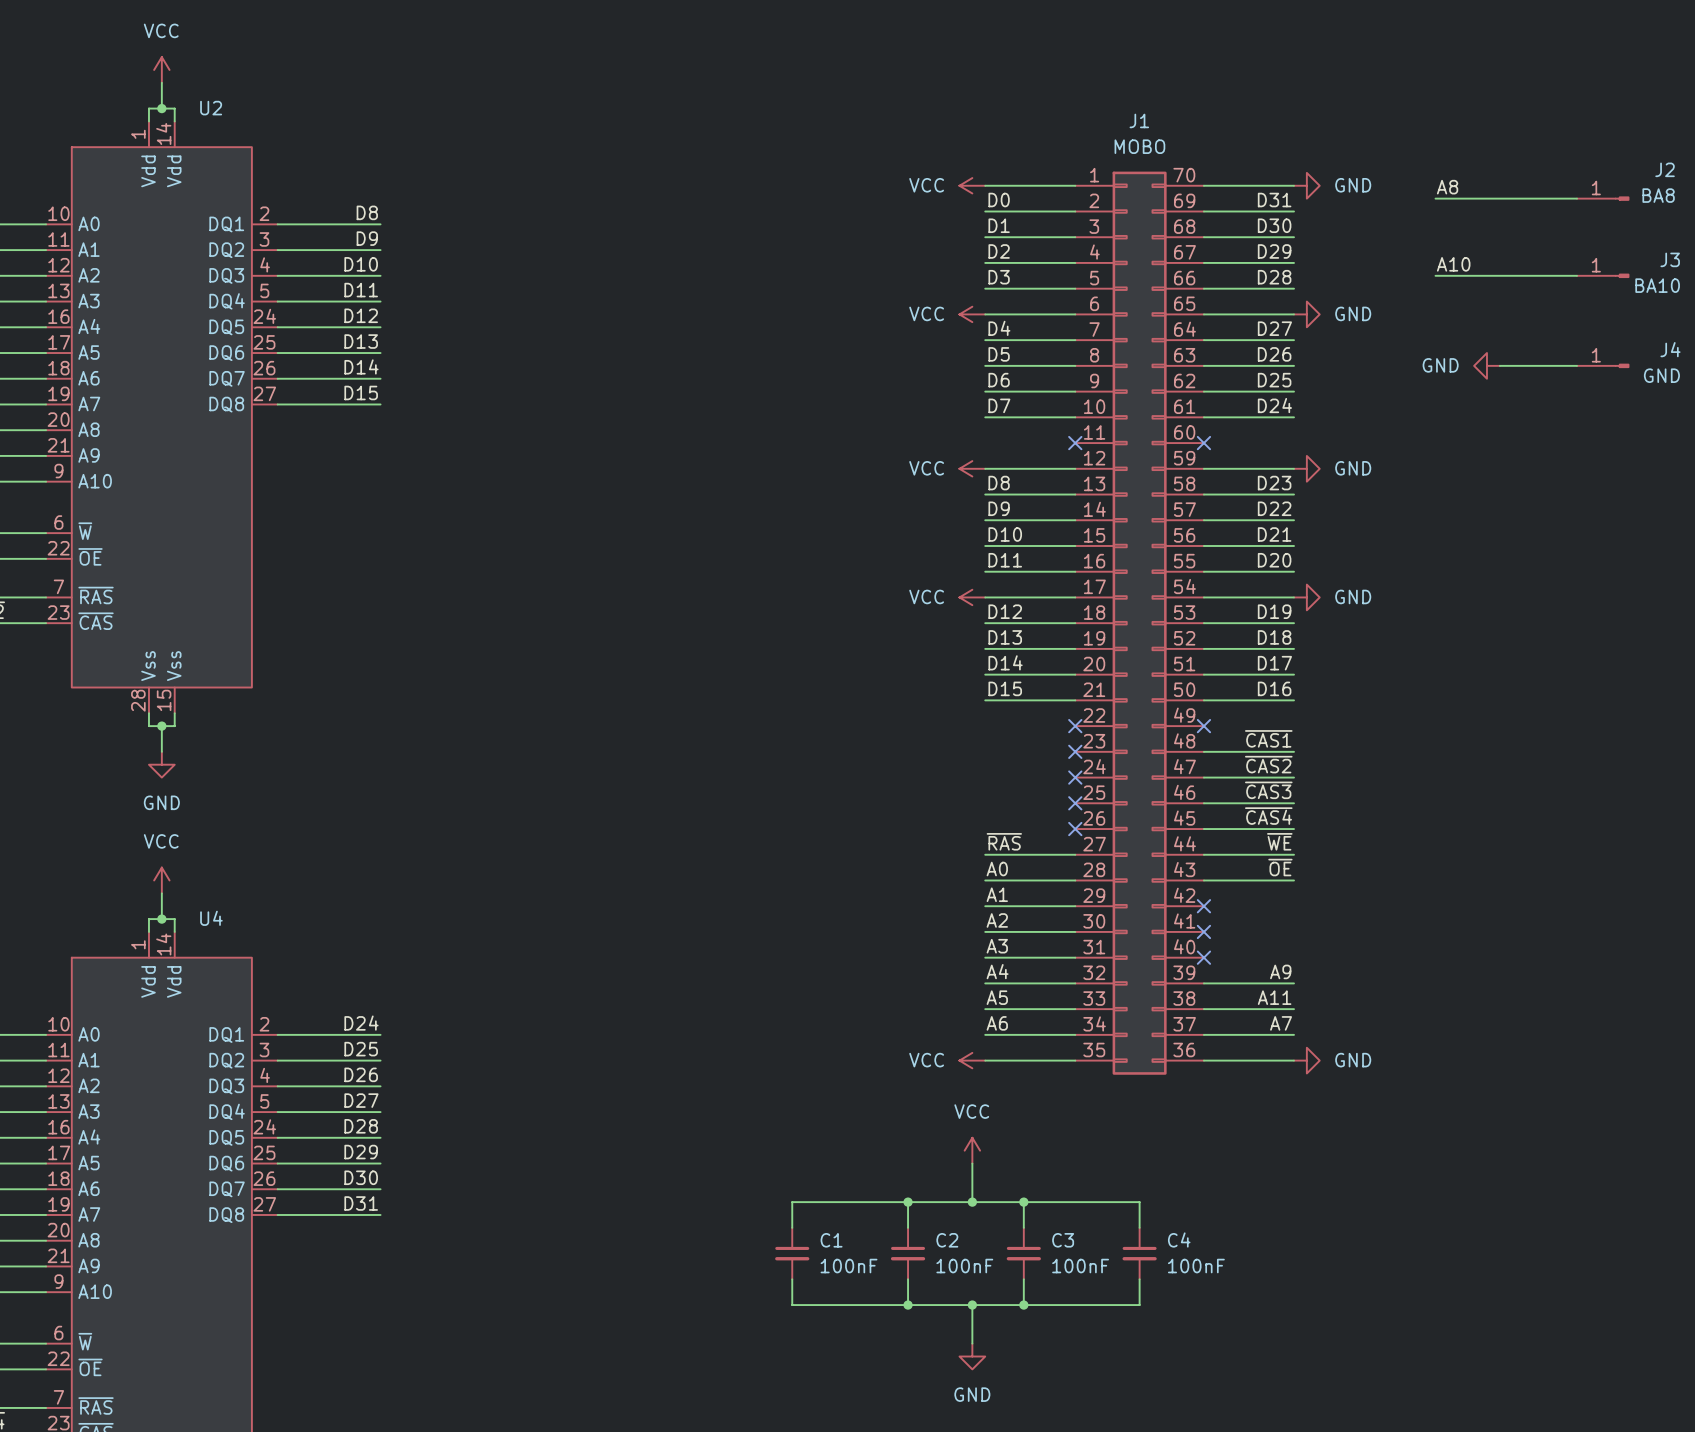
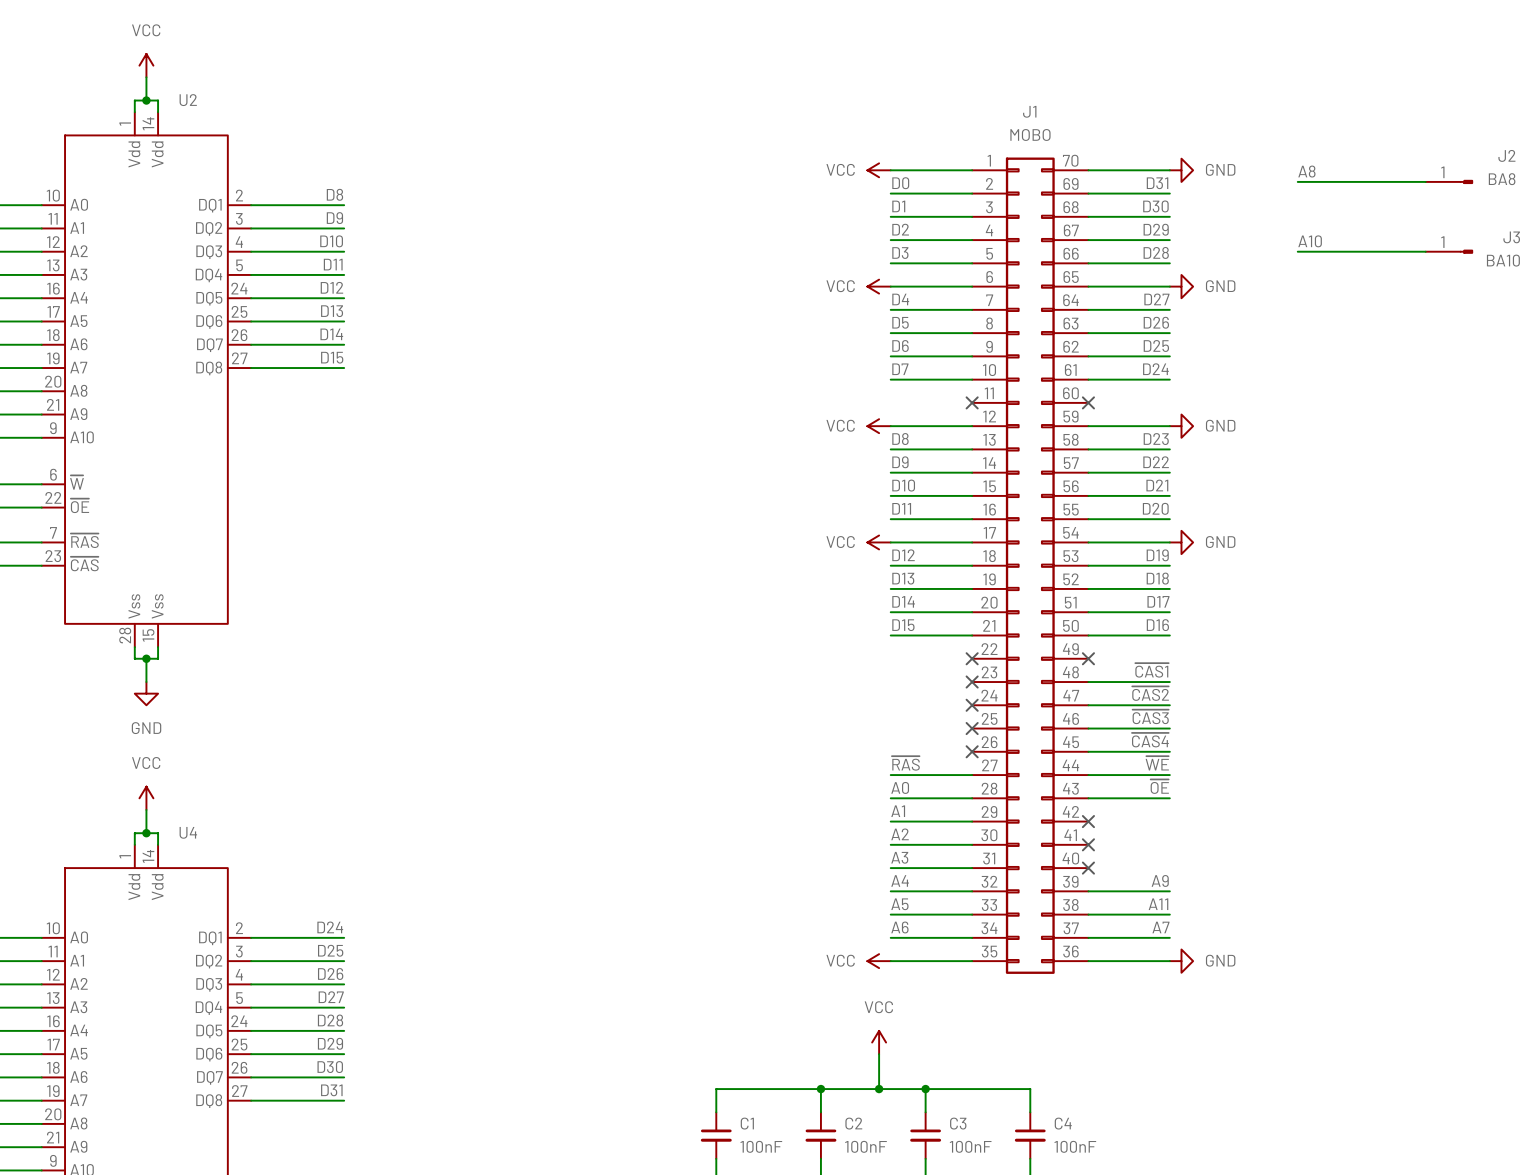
power symbol: GND (1486, 365) -> none
wire: (1499, 365) (1577, 365) -> none
J4: GND (1603, 365) -> none

